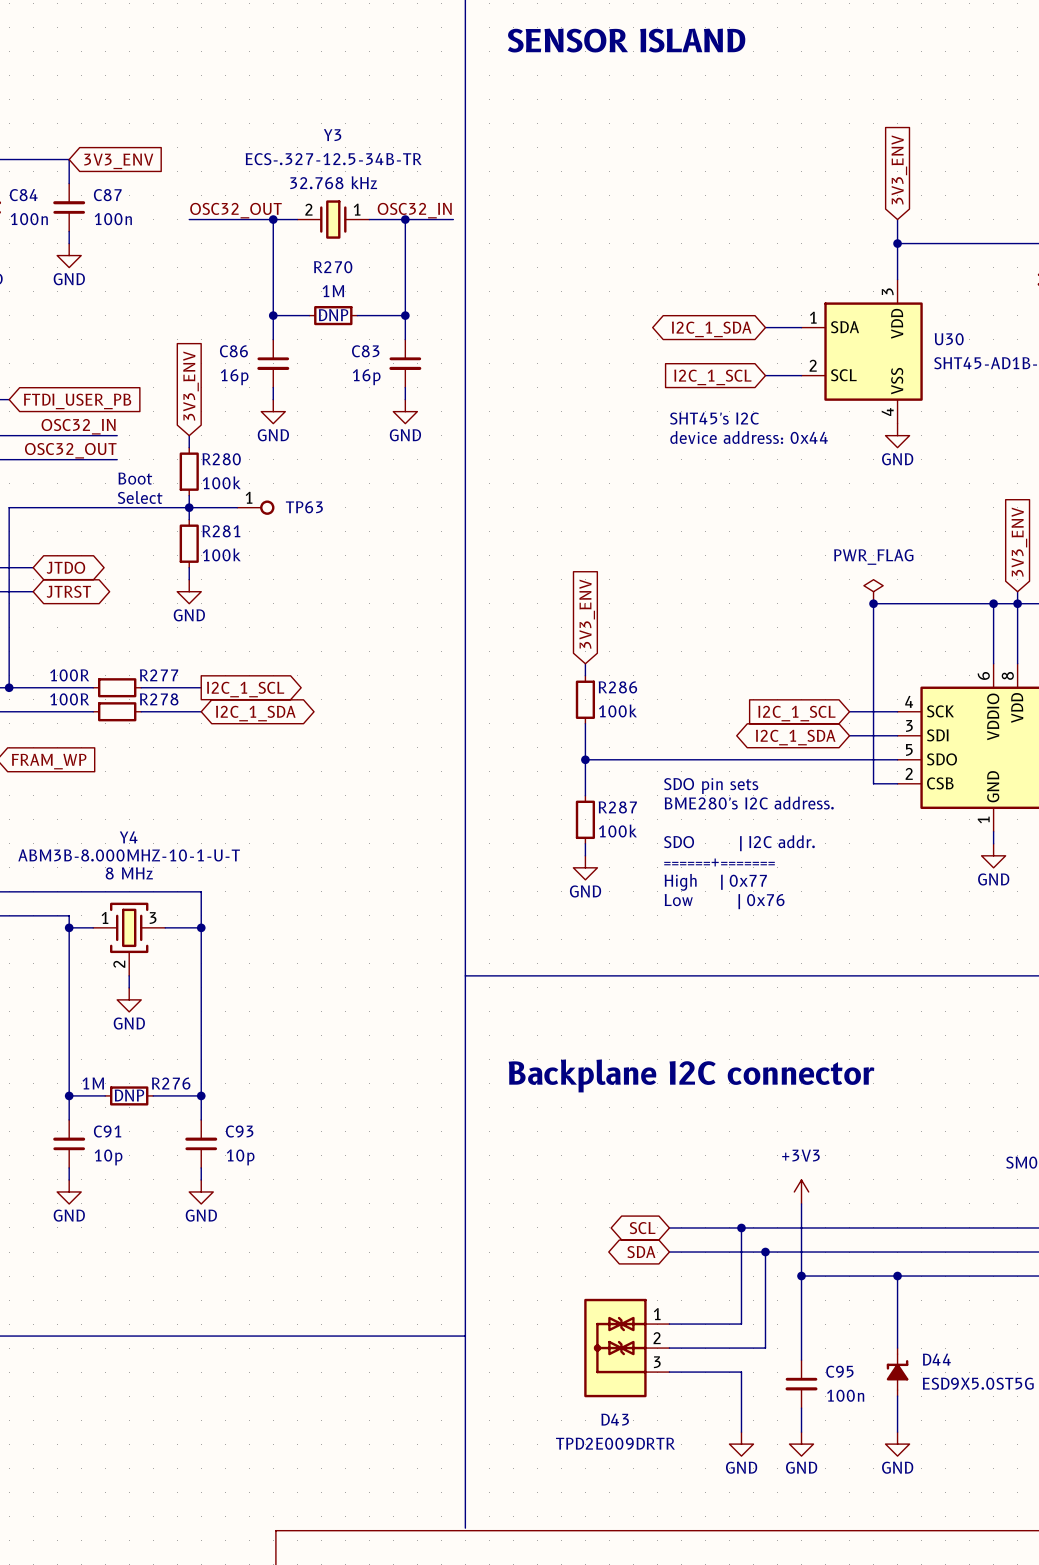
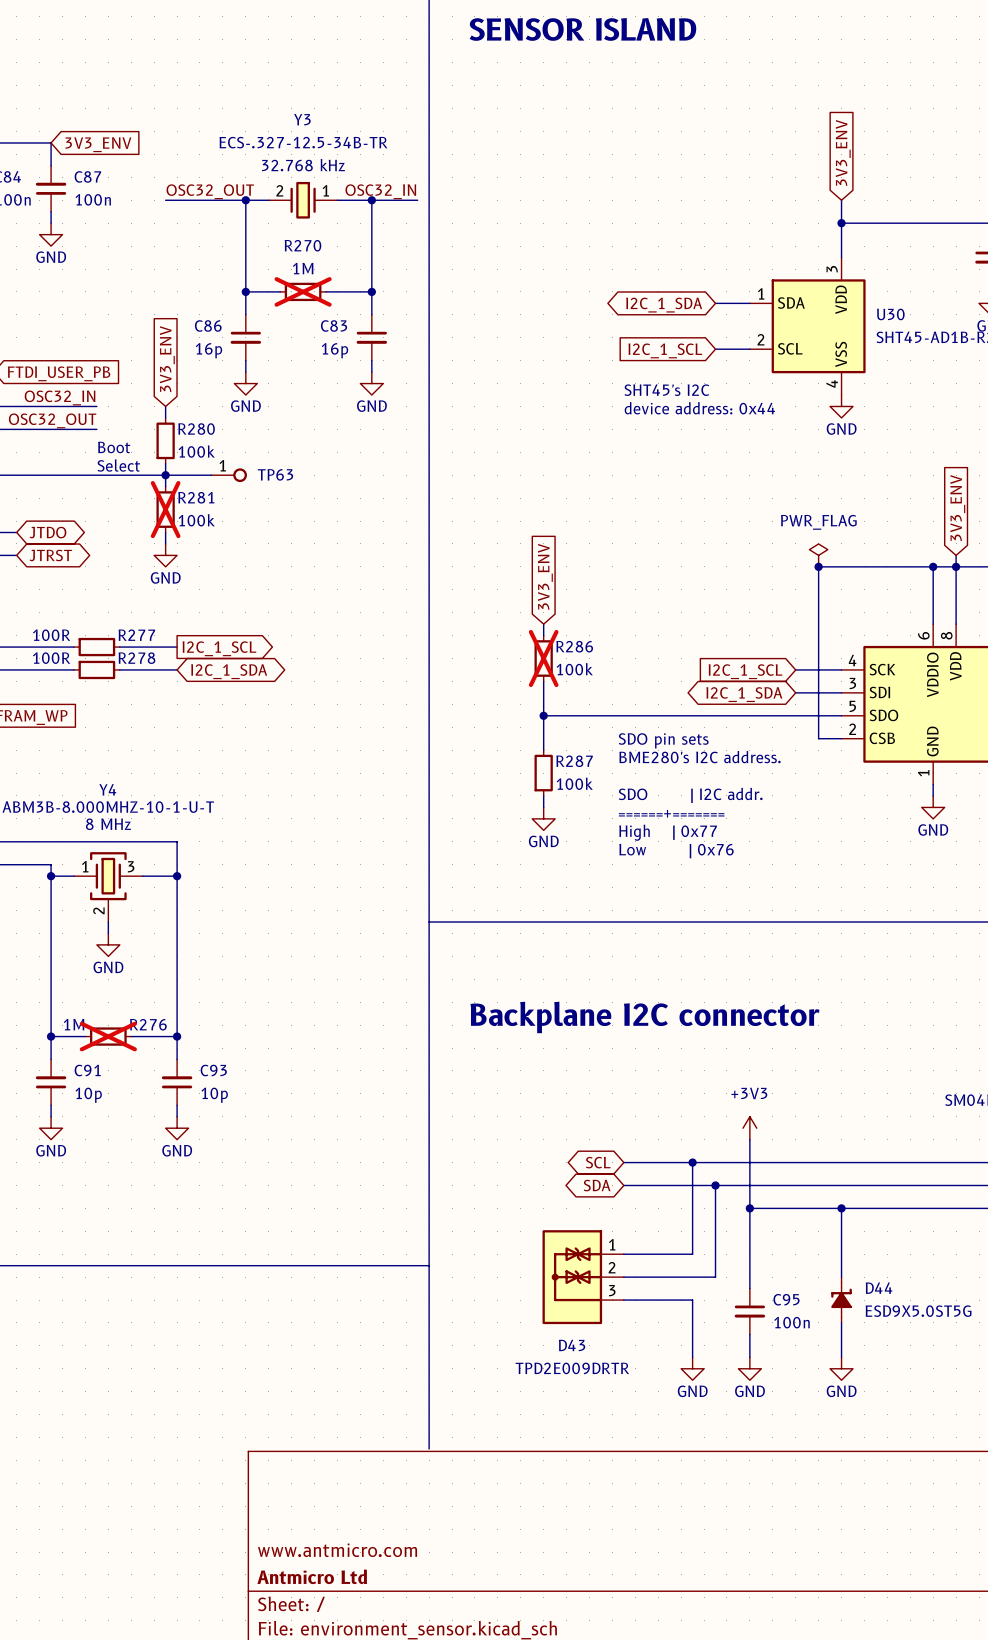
R270 do-not-place cross: none -> (303, 291)
R270 text: DNP (333, 315) -> none
R281 do-not-place cross: none -> (165, 509)
R286 do-not-place cross: none -> (543, 658)
R276 do-not-place cross: none -> (108, 1036)
R276 text: DNP (129, 1095) -> none

